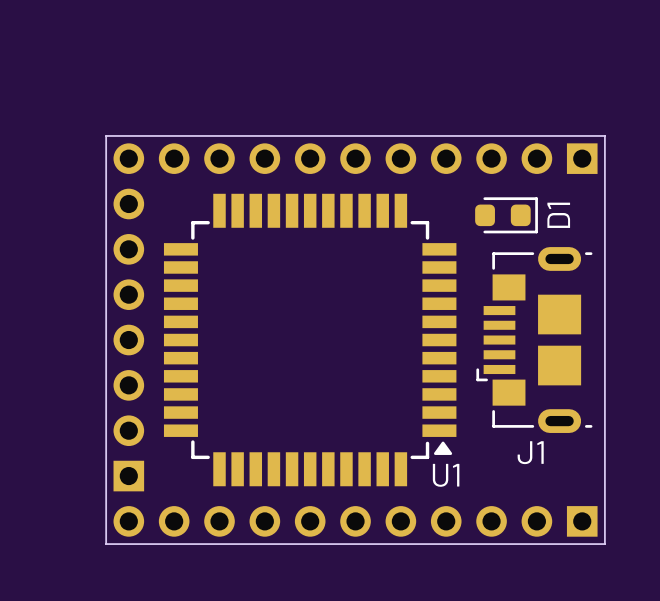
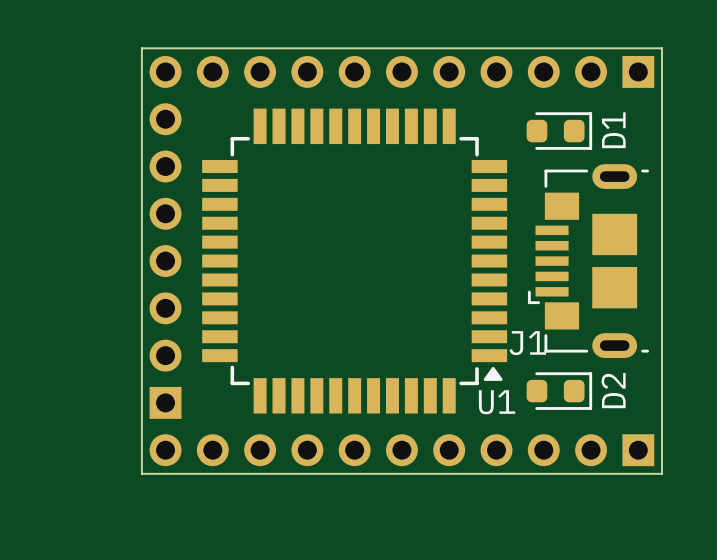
J1 name position: J1 (530, 452) -> J1 (527, 343)
D2: none -> (559, 391)

